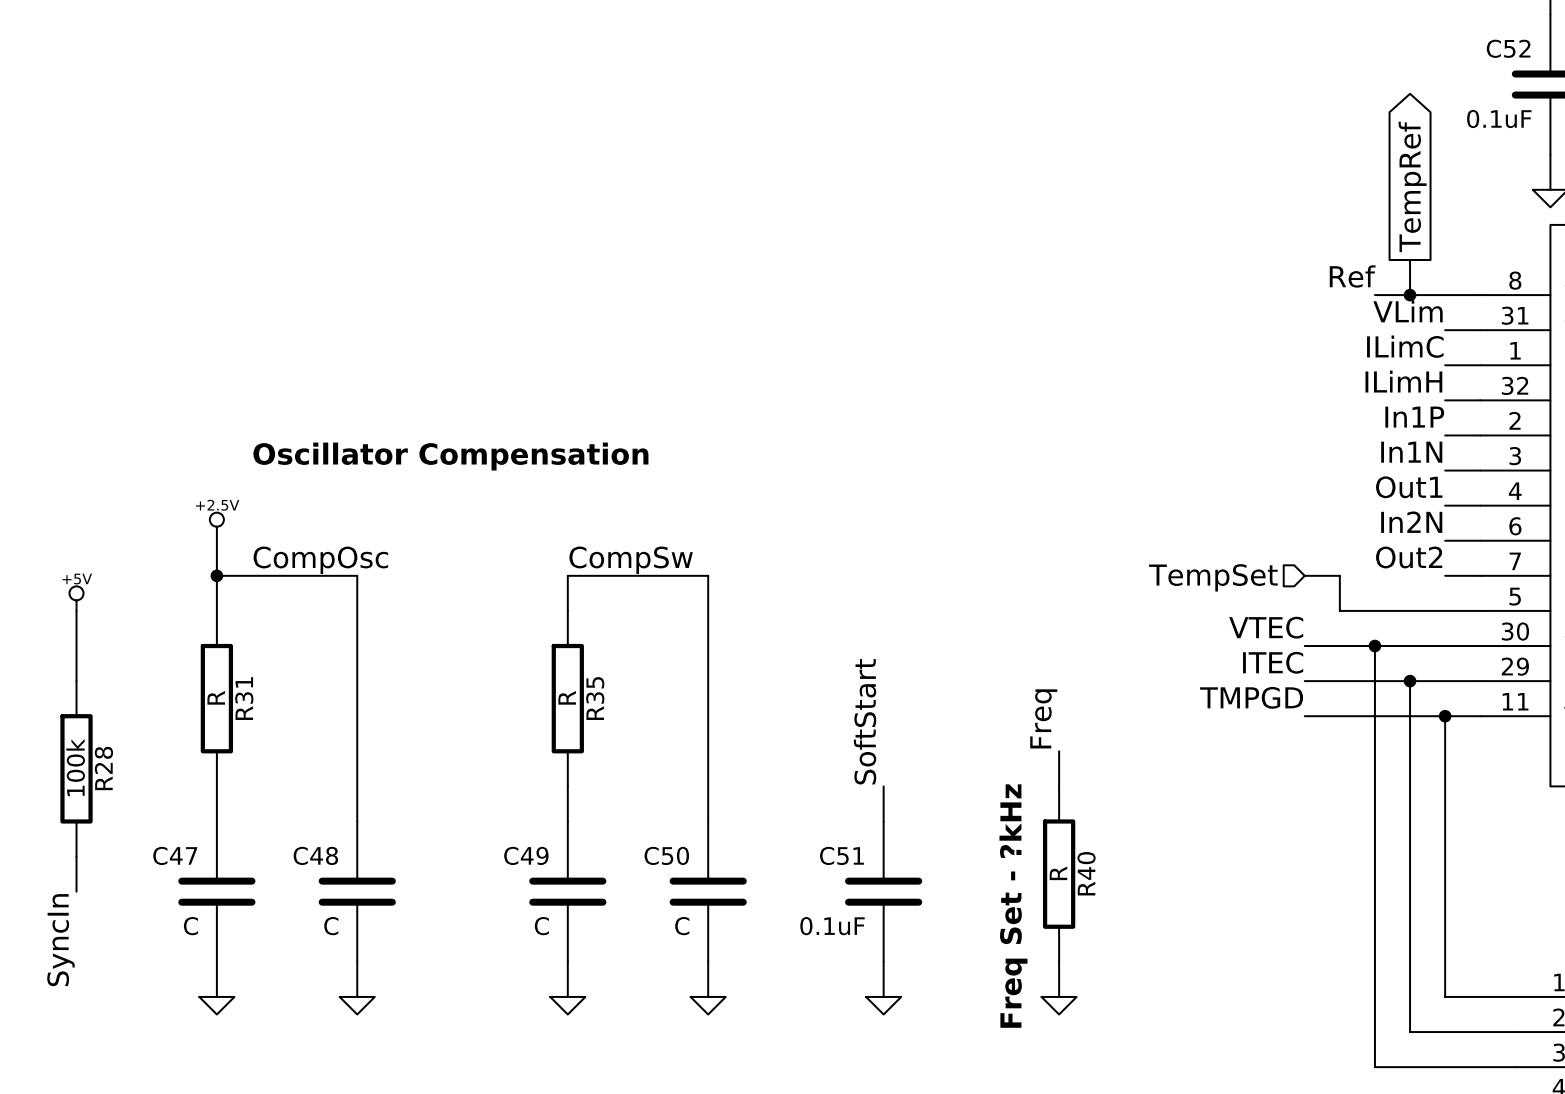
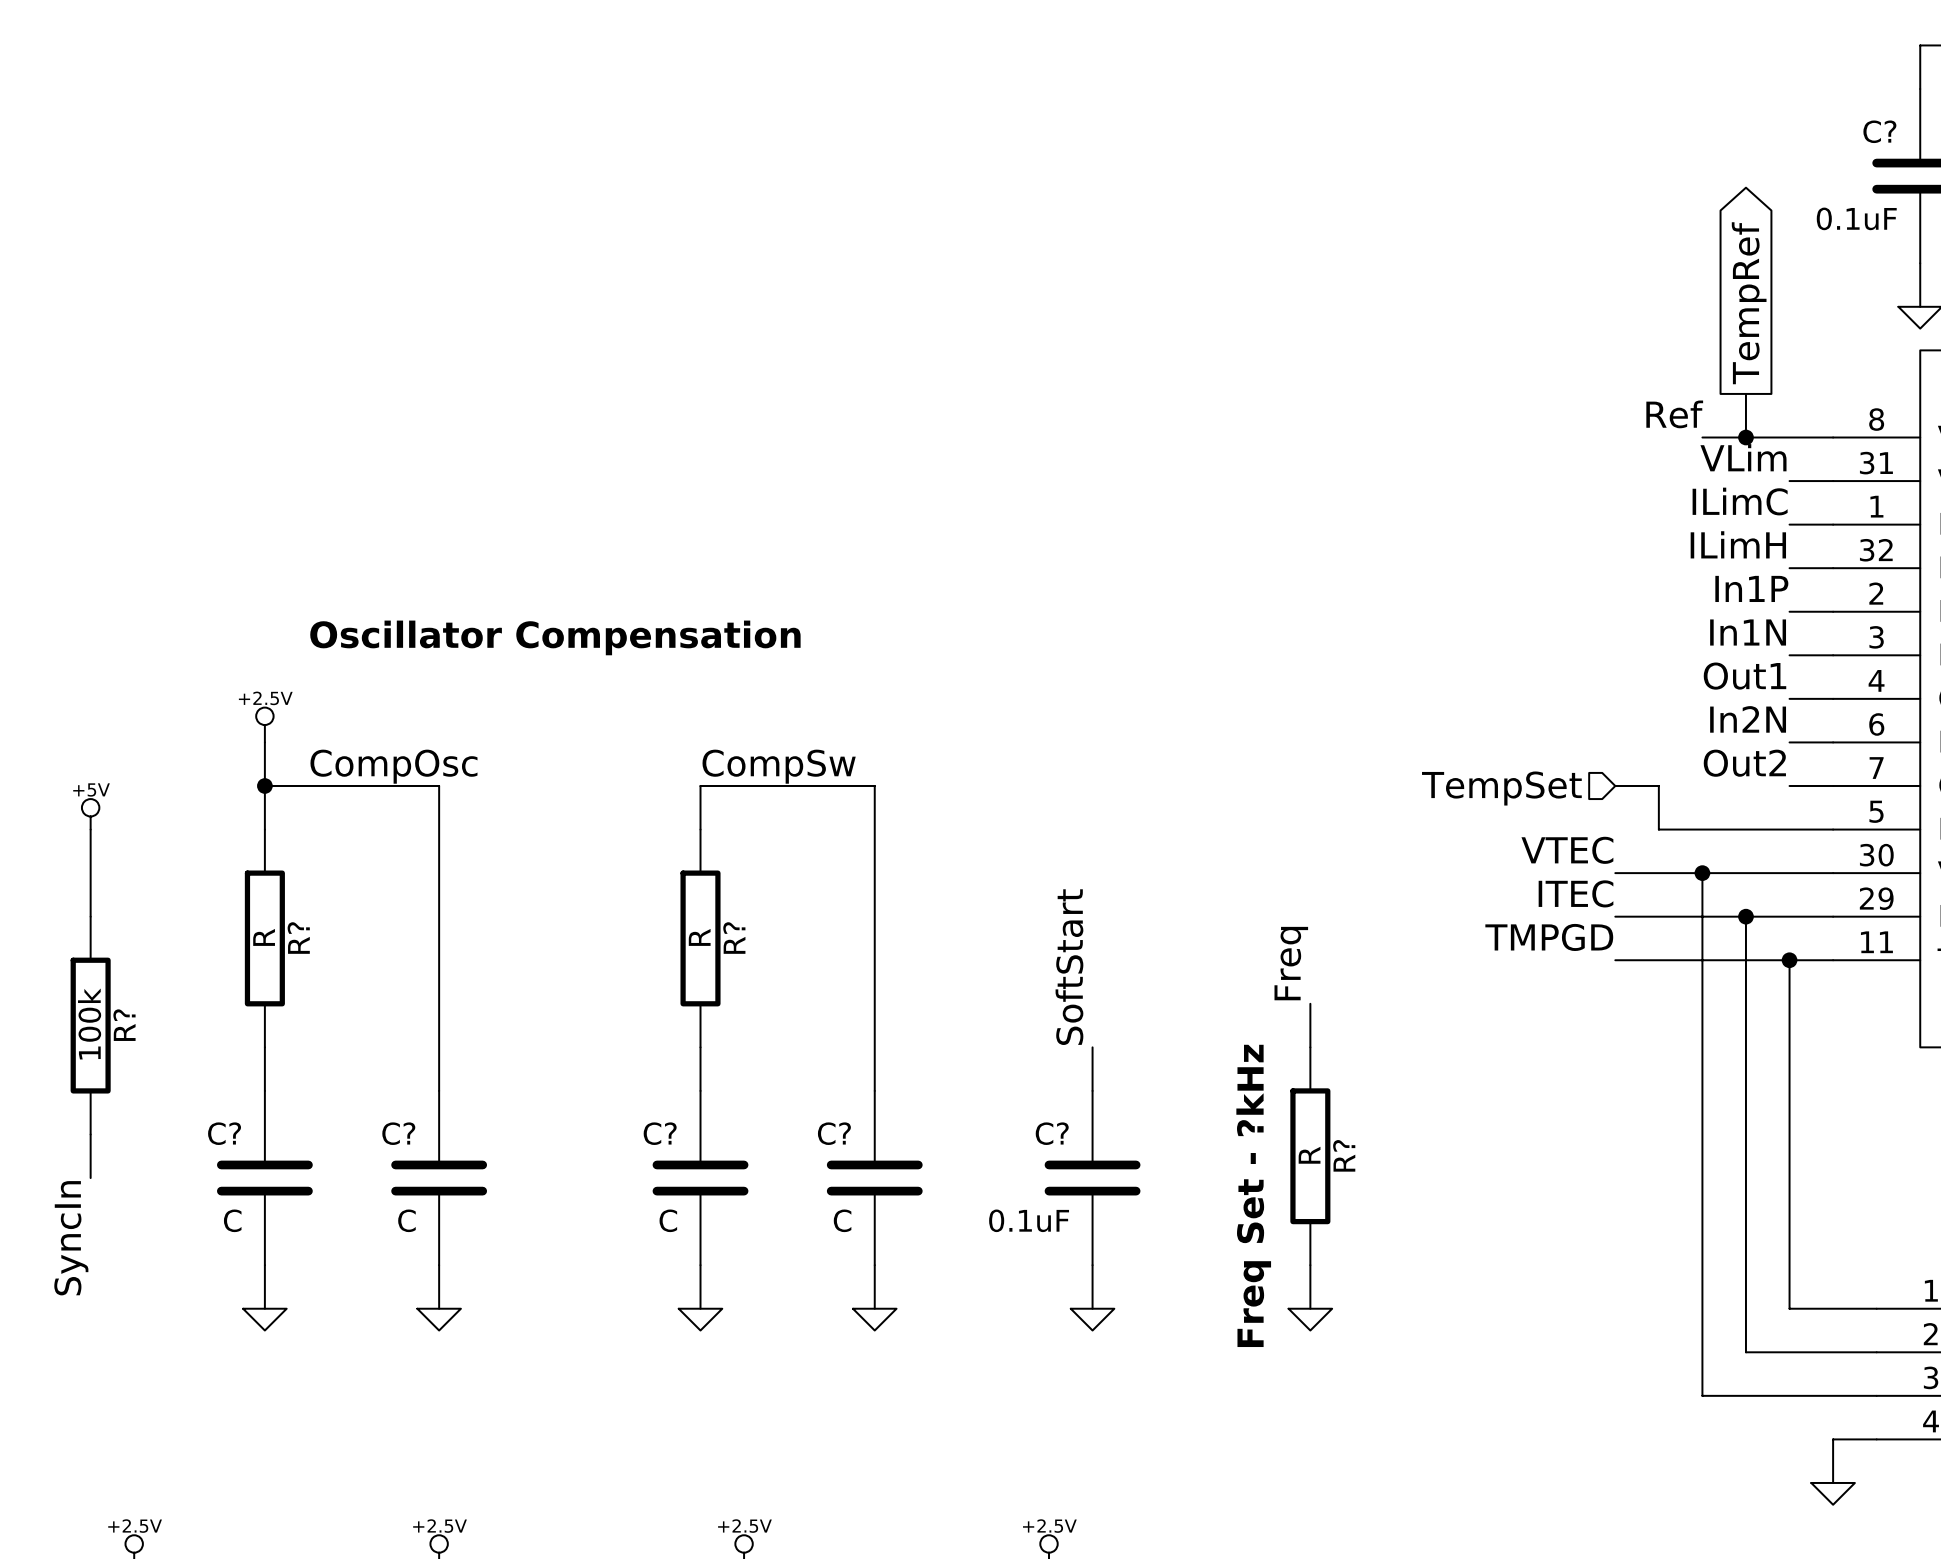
C52 name: C52 (1508, 48) -> C? (1879, 131)
R31 name: R31 (244, 698) -> R? (298, 938)
R35 name: R35 (595, 698) -> R? (734, 938)
R28 name: R28 (103, 768) -> R? (124, 1025)
C47 name: C47 (175, 855) -> C? (224, 1133)
C48 name: C48 (315, 855) -> C? (398, 1133)
C49 name: C49 (526, 855) -> C? (660, 1133)
C50 name: C50 (666, 855) -> C? (834, 1133)
C51 name: C51 (841, 855) -> C? (1052, 1133)
R40 name: R40 (1086, 873) -> R? (1344, 1155)

